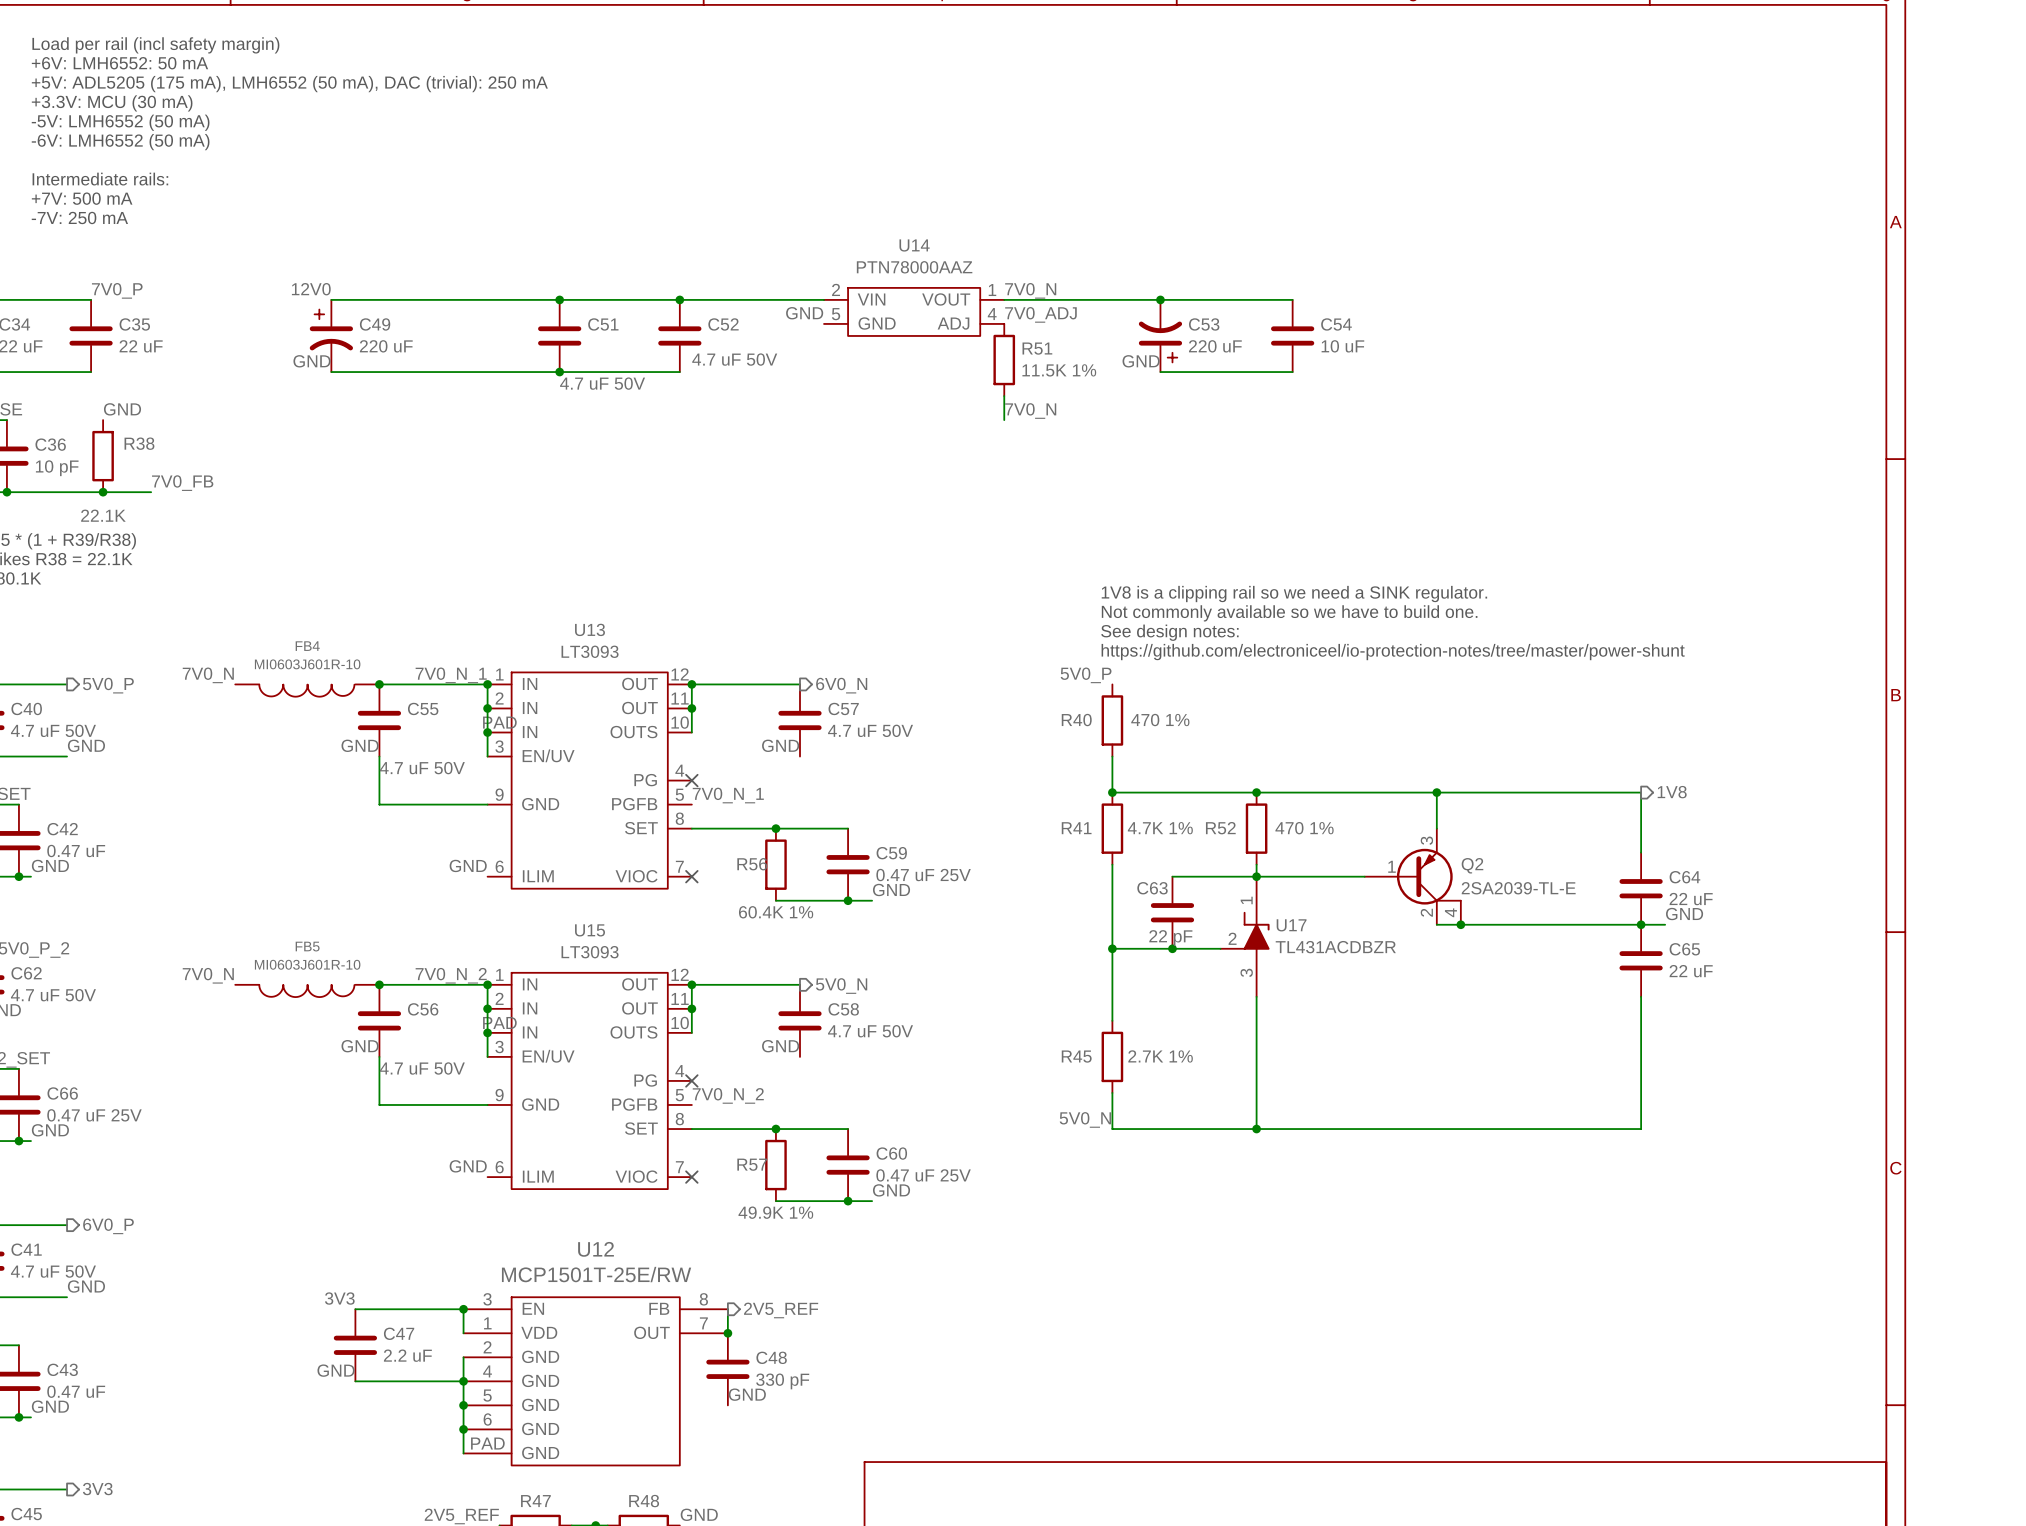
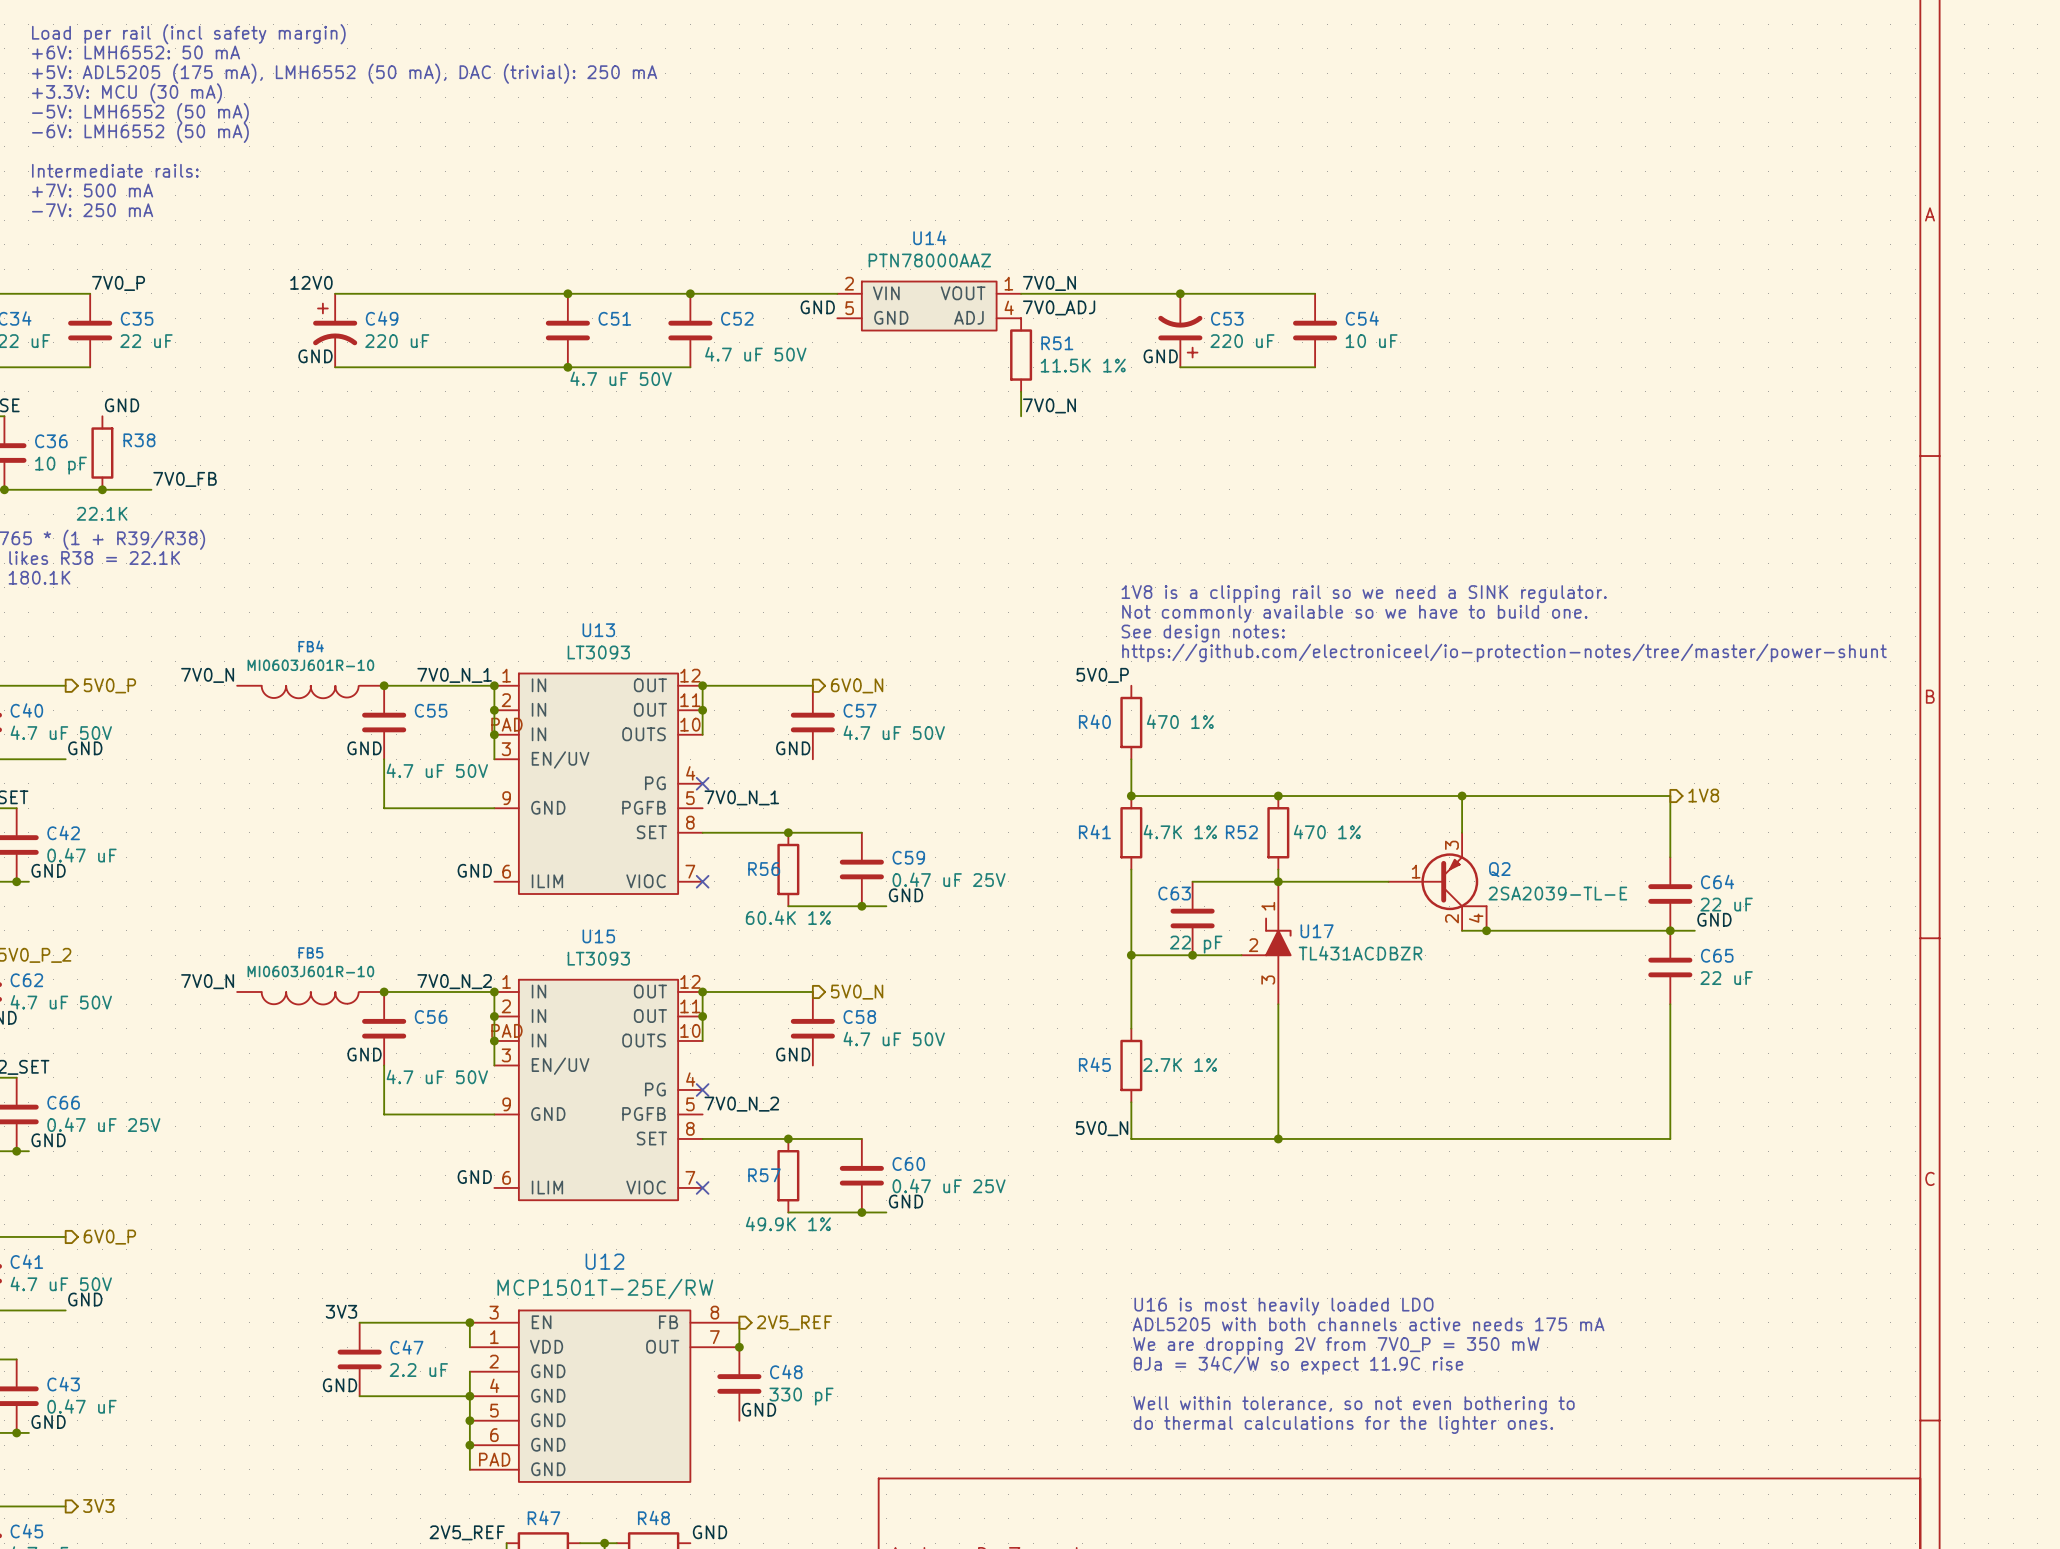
text: none -> U16 is most heavily loaded LDO (1283, 1306)
text: none -> ADL5205 with both channels active needs 175 mA (1368, 1324)
text: none -> We are dropping 2V from 7V0_P = 350 mW (1336, 1346)
text: none -> θJa = 34C/W so expect 11.9C rise (1298, 1365)
text: none -> Well within tolerance, so not even bothering to (1353, 1405)
text: none -> do thermal calculations for the lighter ones. (1343, 1424)

